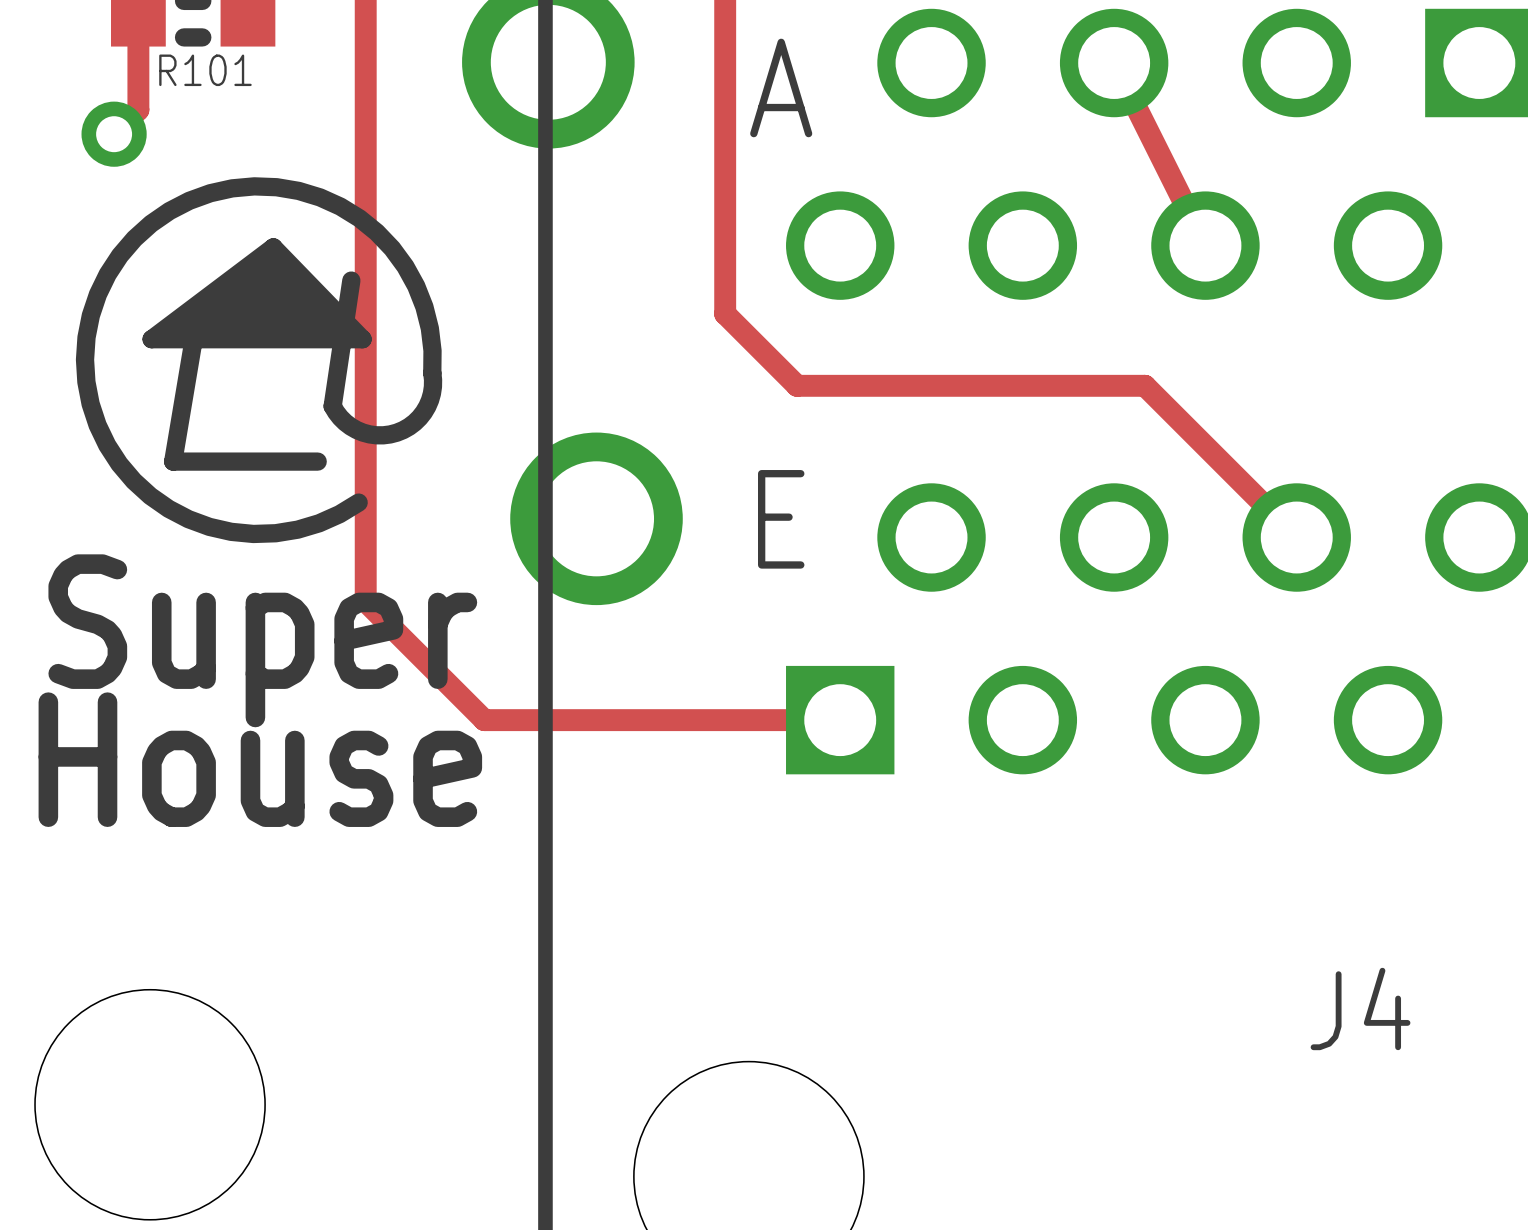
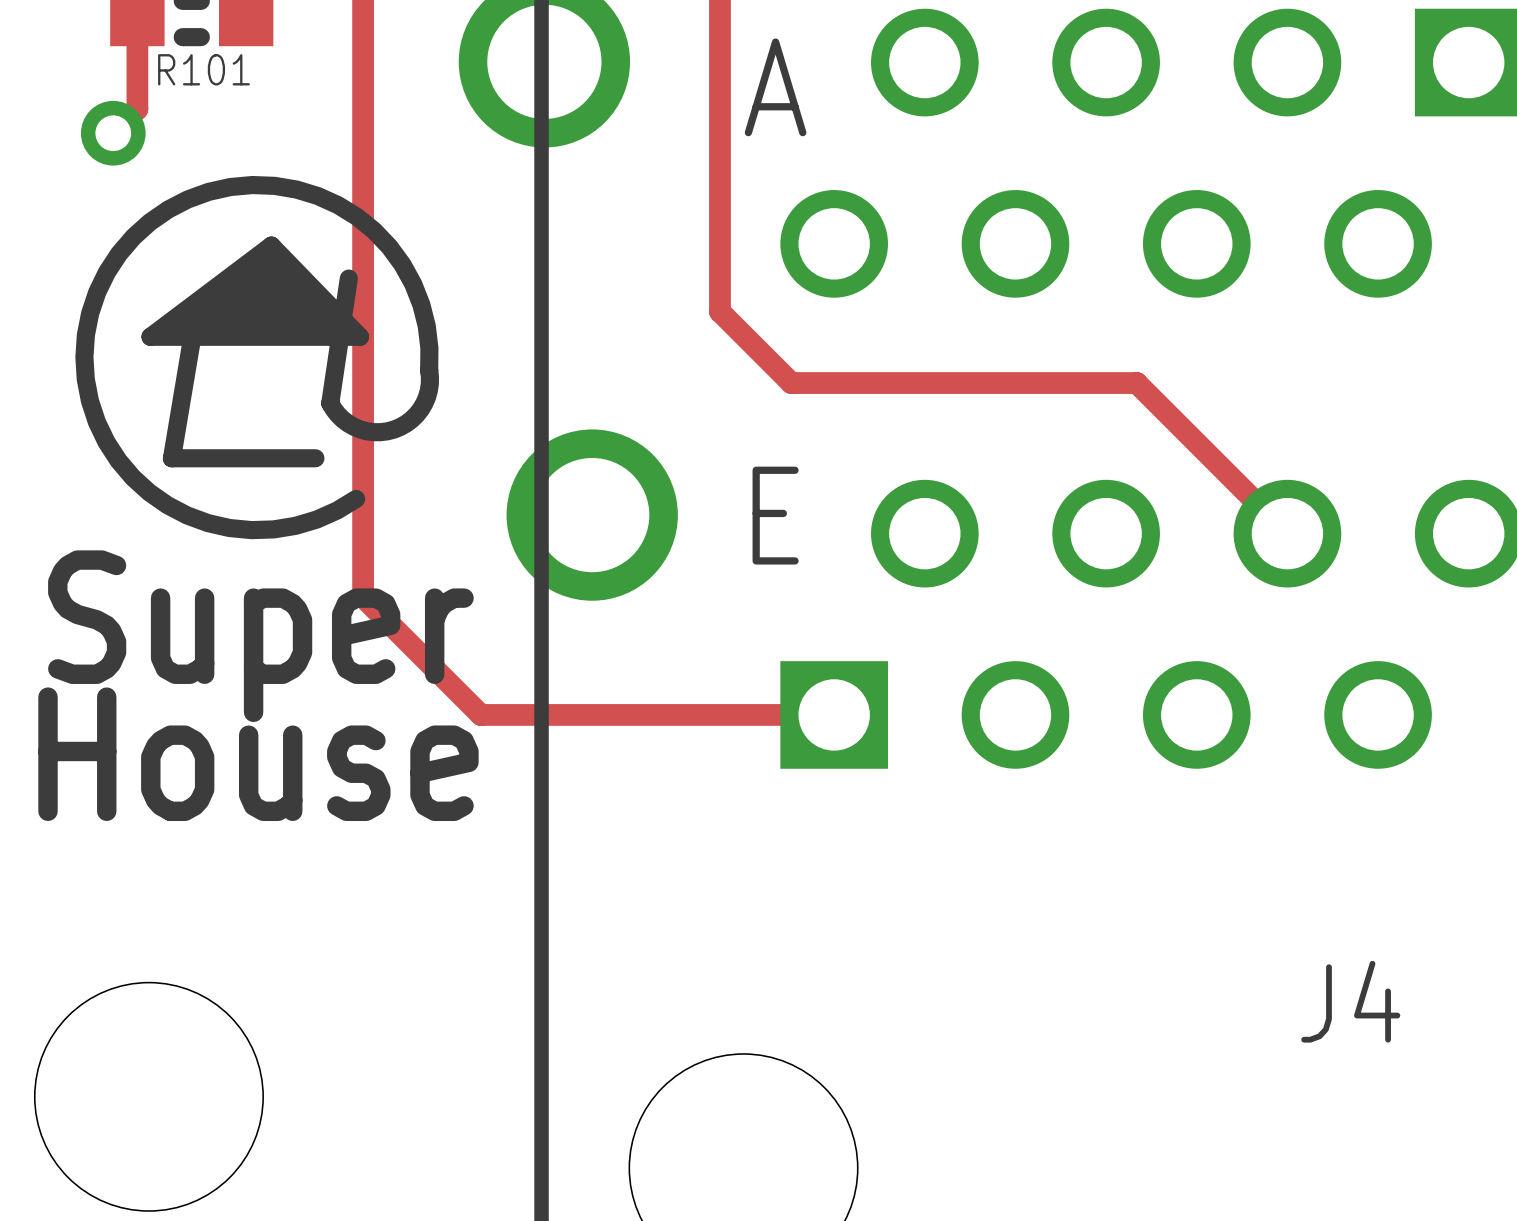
track: (1114, 63) (1205, 245) -> none

